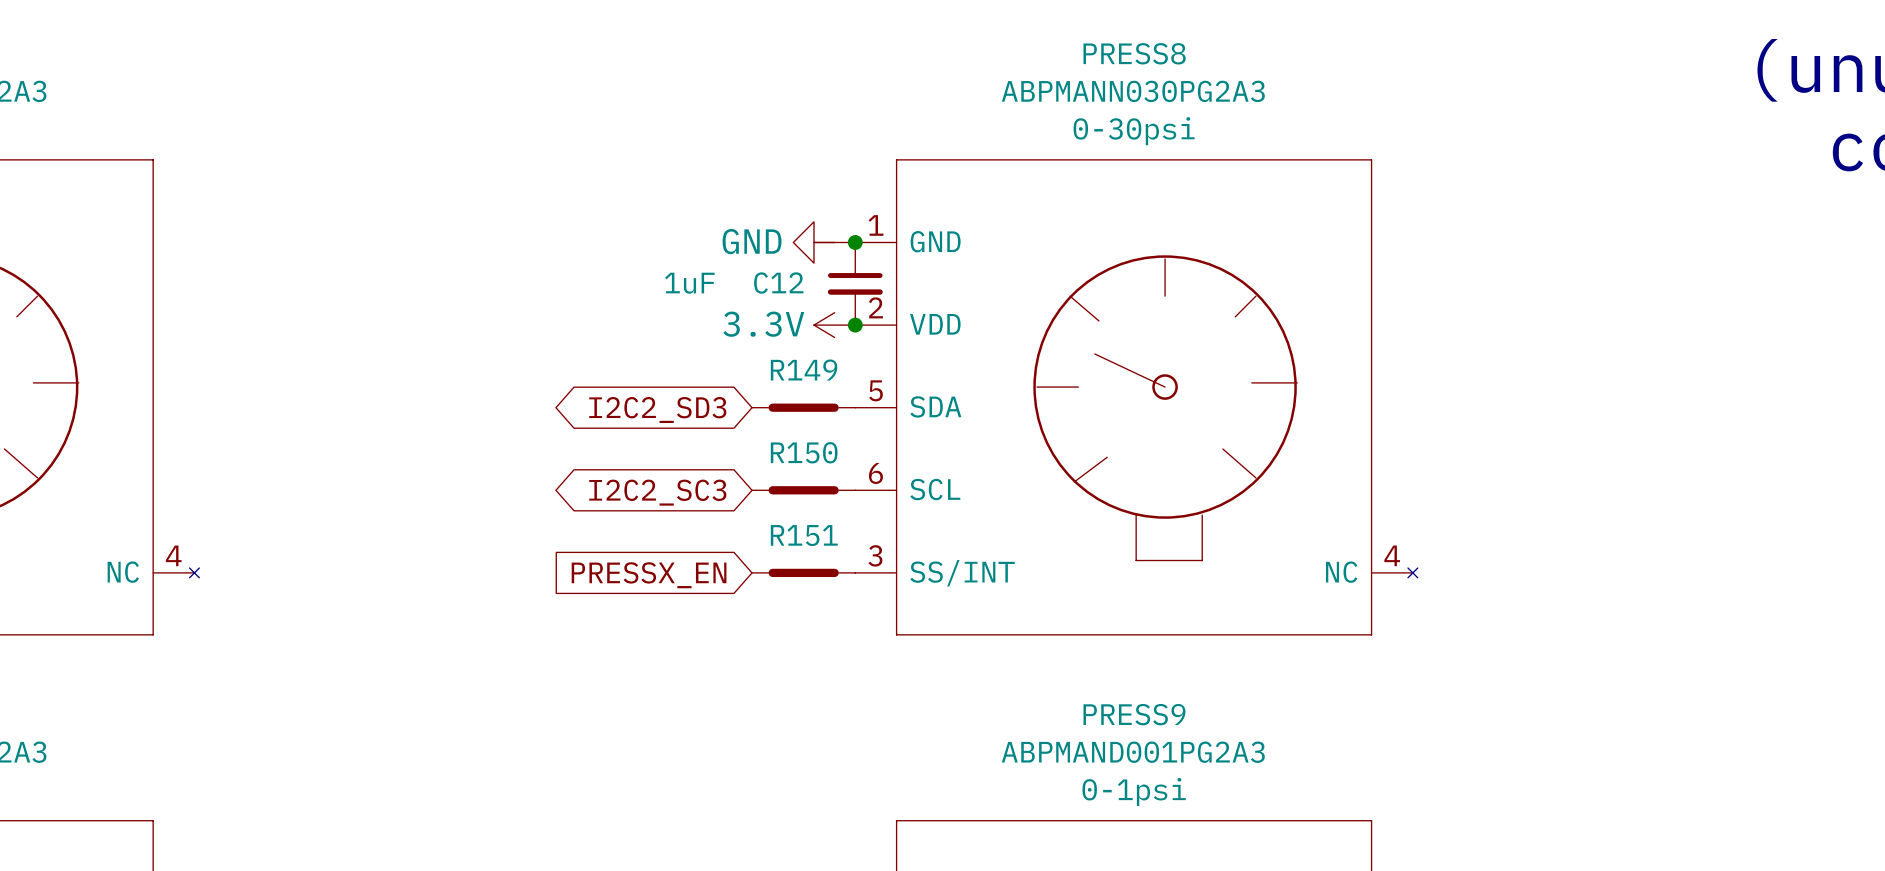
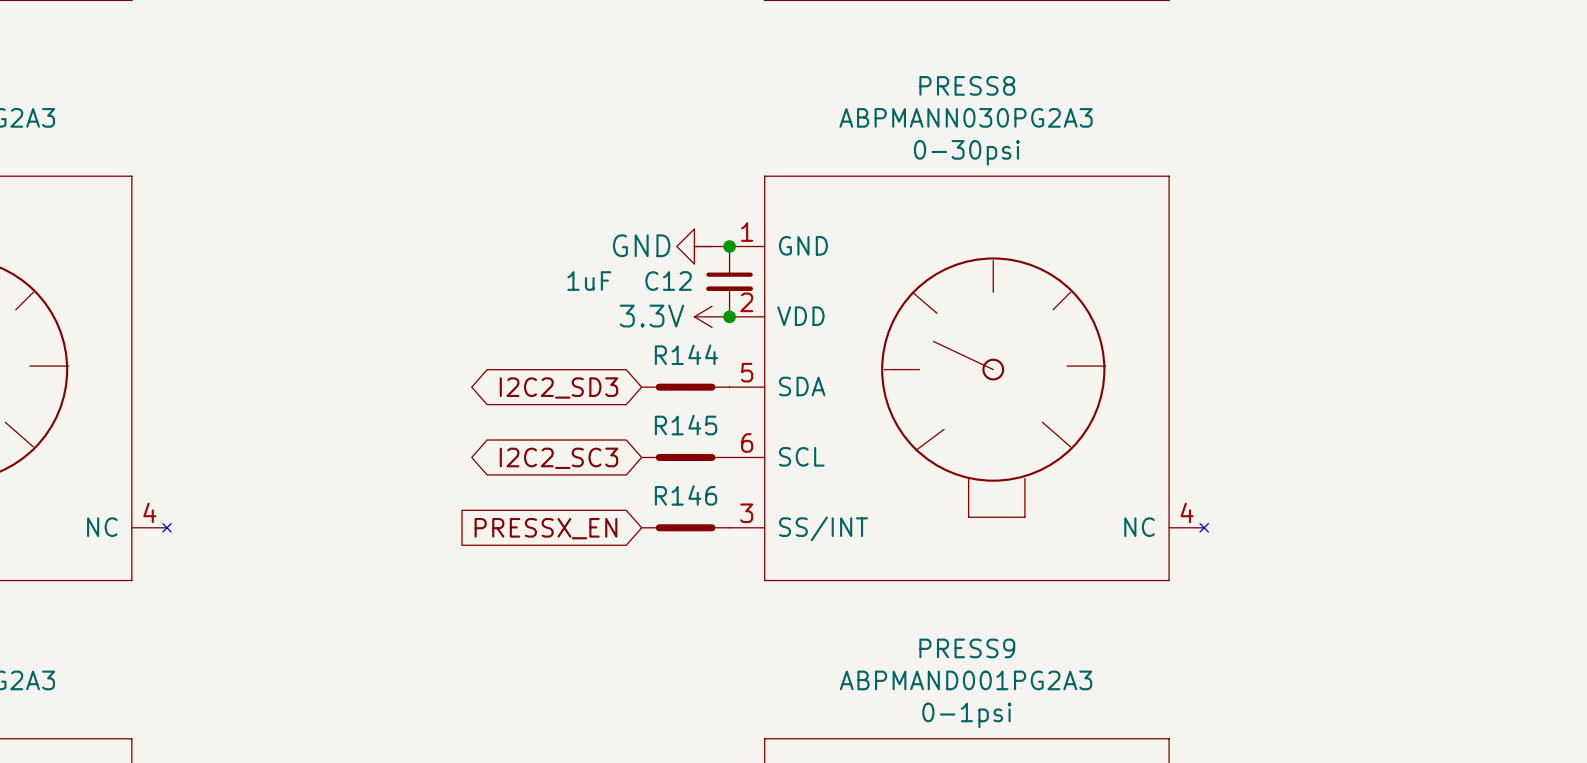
R149 name: R149 (804, 369) -> R144 (686, 354)
R150 name: R150 (804, 452) -> R145 (686, 425)
R151 name: R151 (804, 535) -> R146 (686, 495)

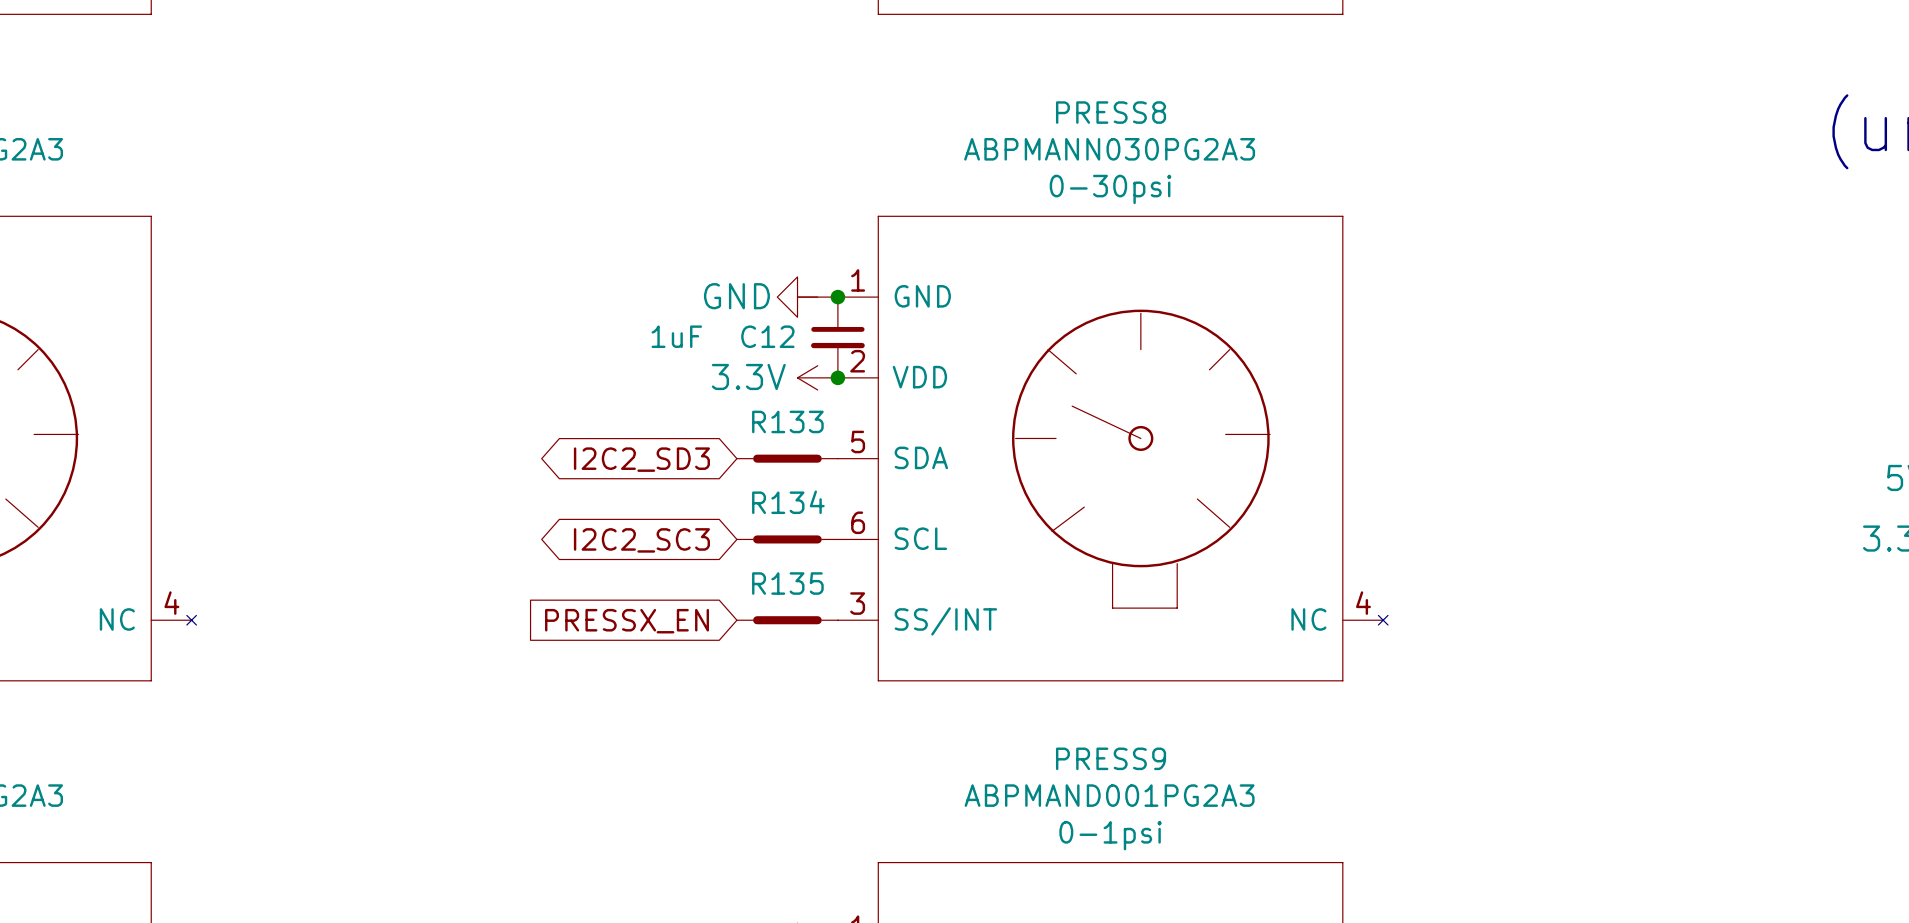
R144 name: R144 (686, 354) -> R133 (787, 421)
R145 name: R145 (686, 425) -> R134 (788, 502)
R146 name: R146 (686, 495) -> R135 (787, 583)

